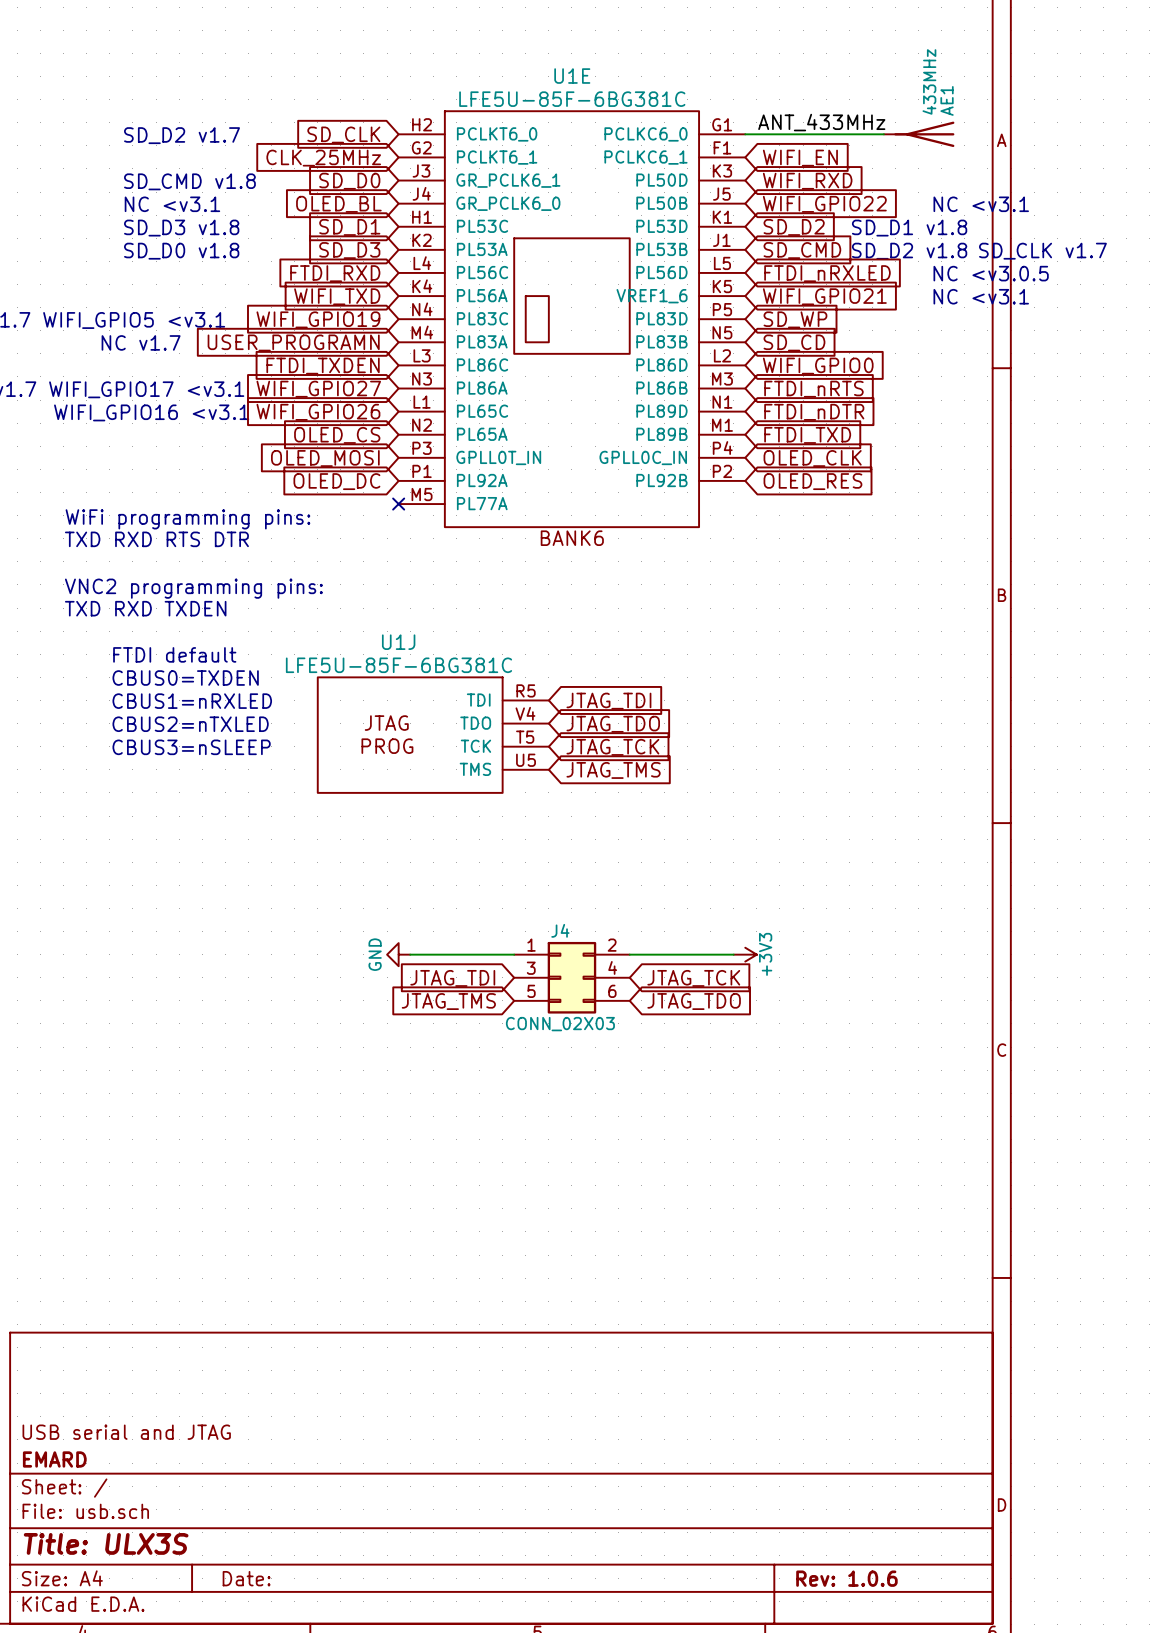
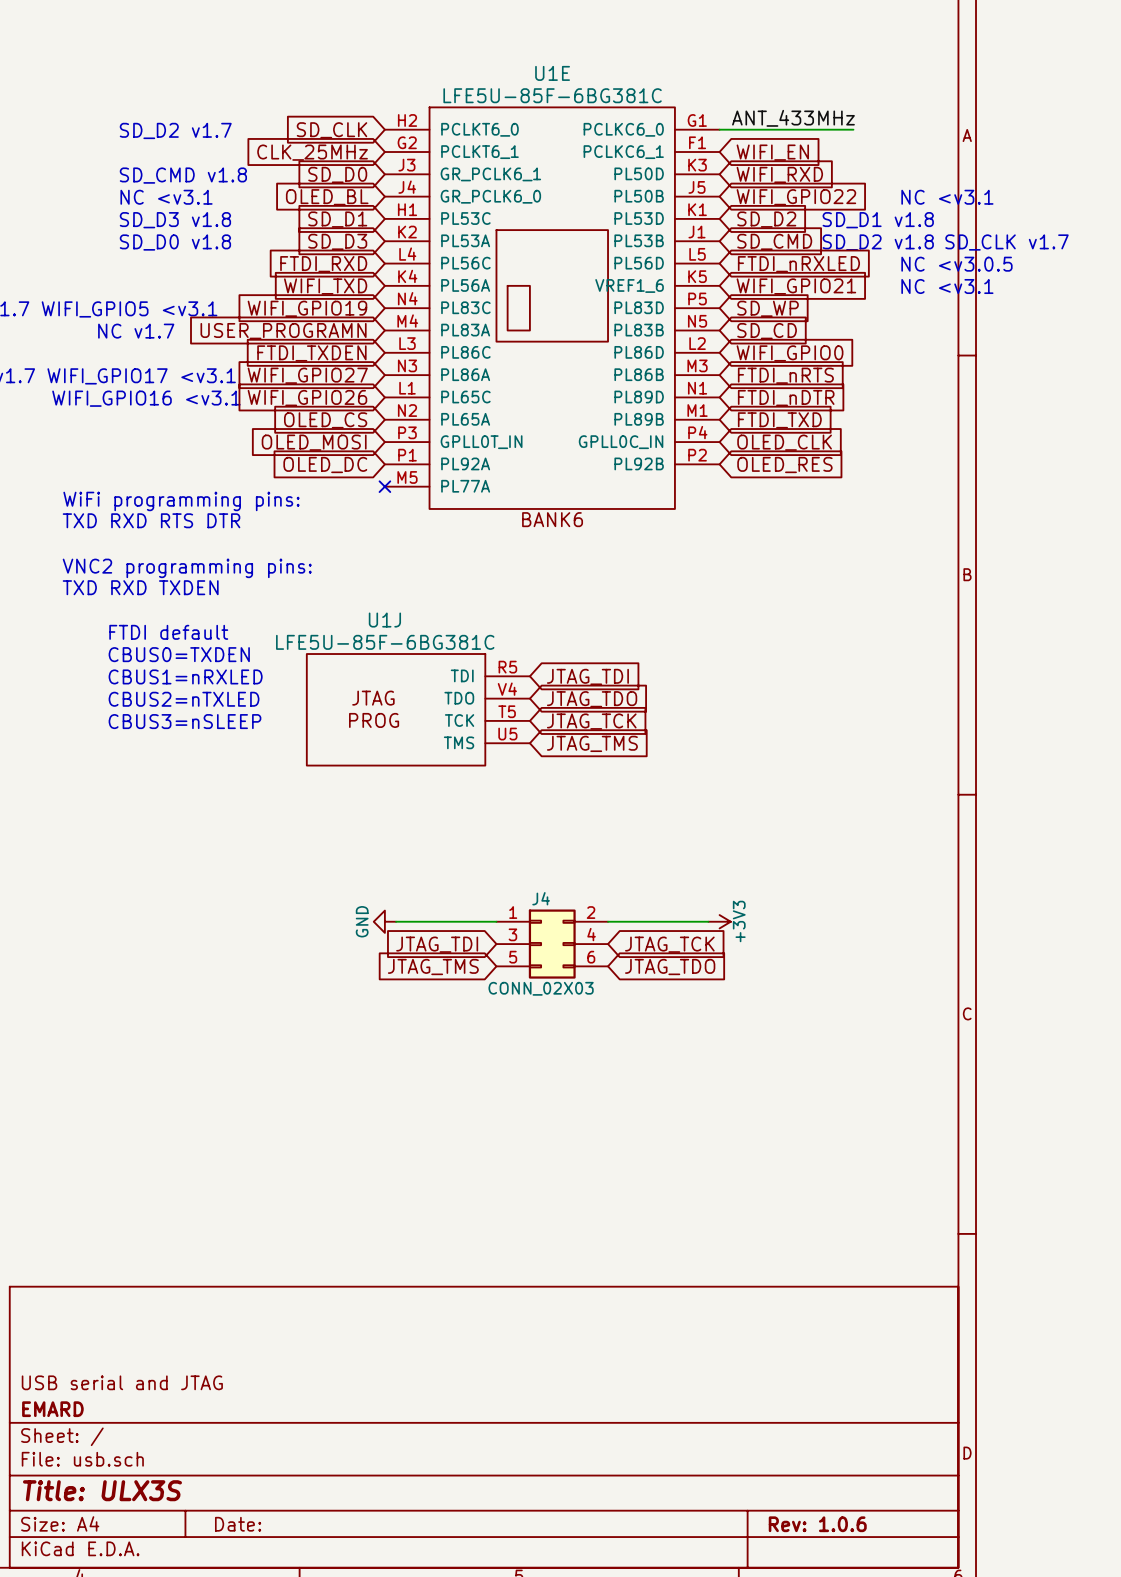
AE1: 433MHz (919, 134) -> none

